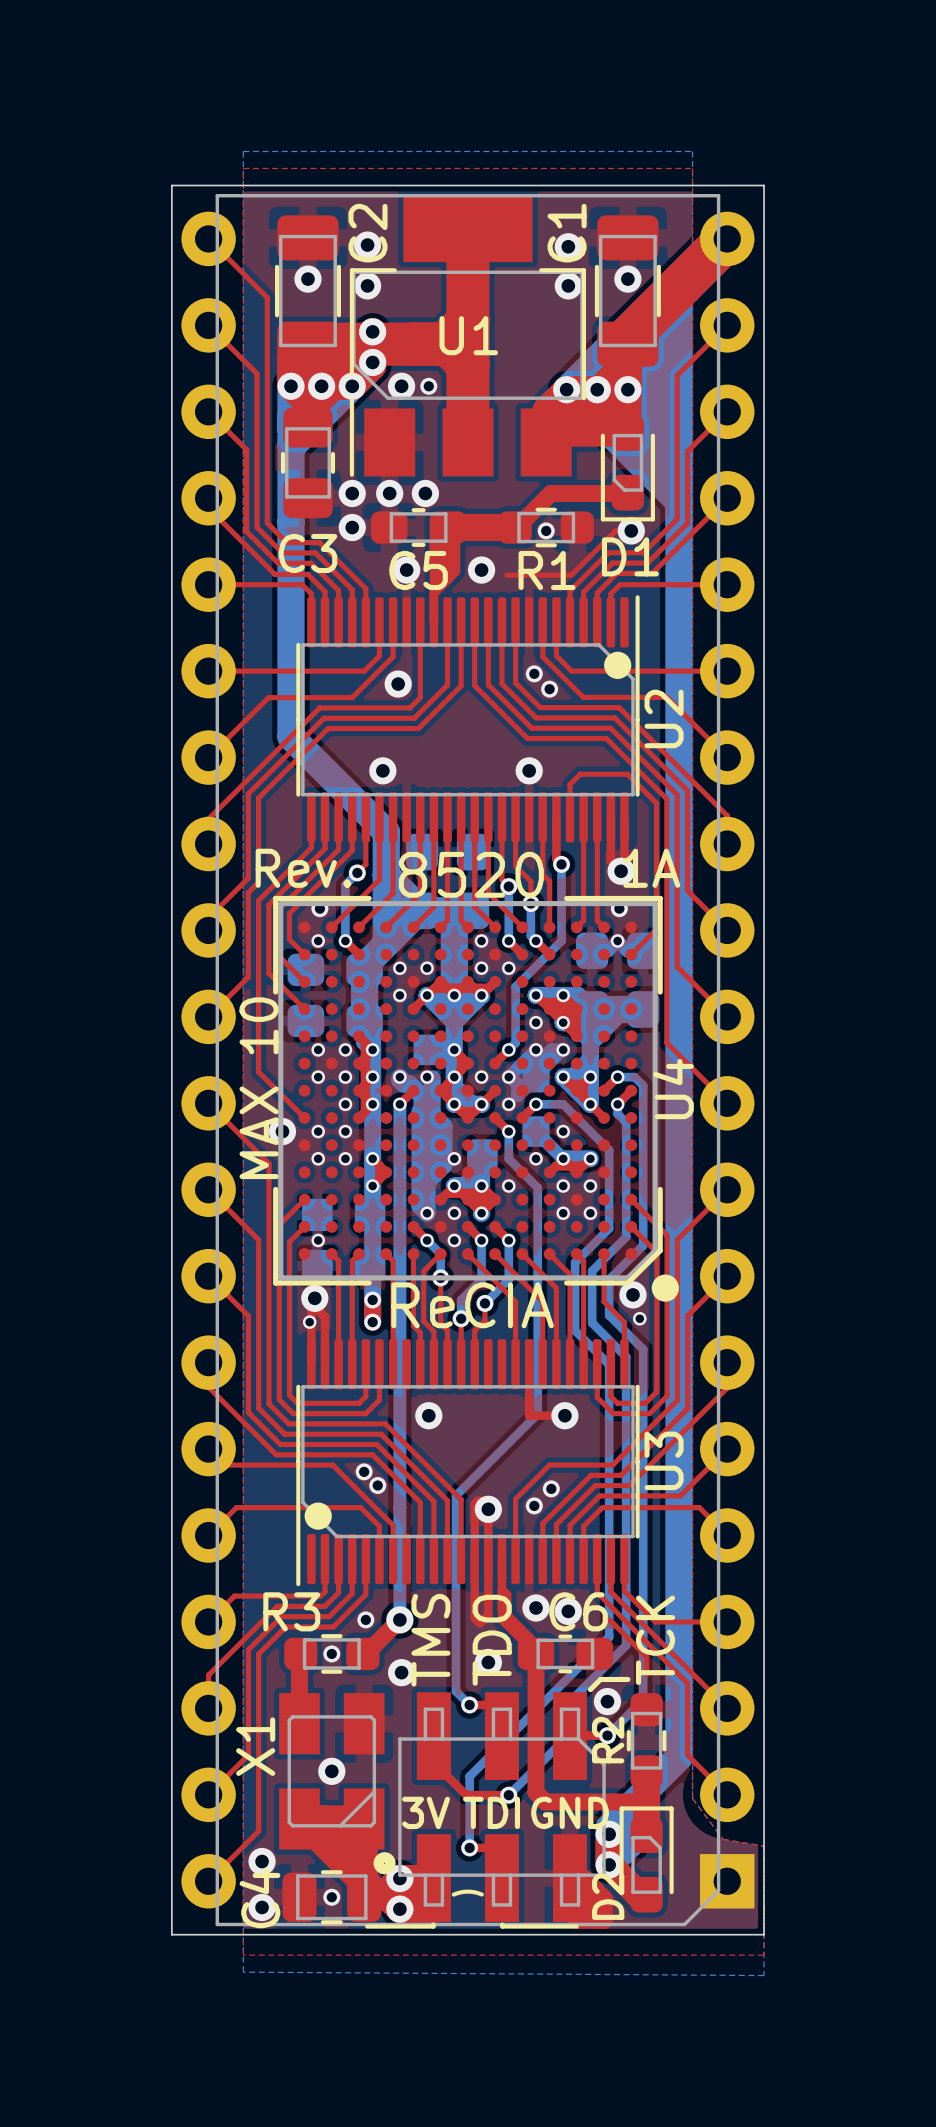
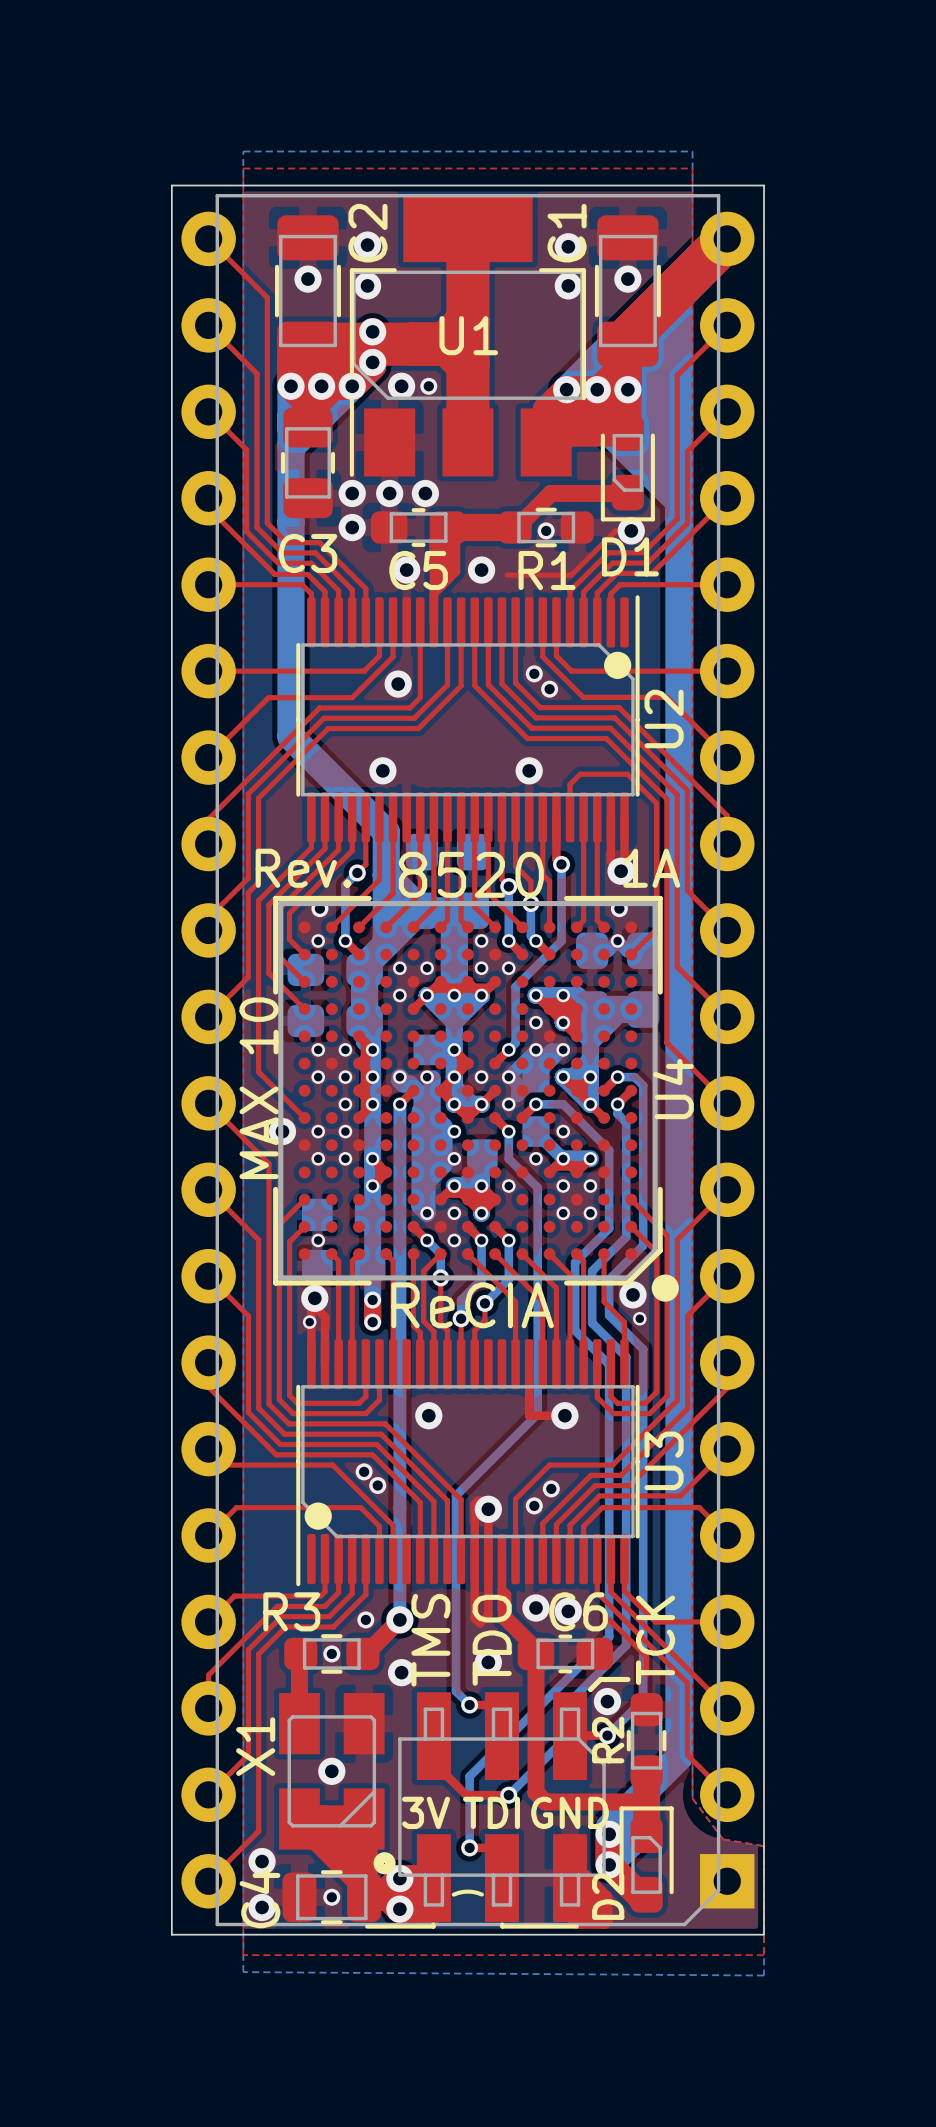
via: none -> (454, 1131)

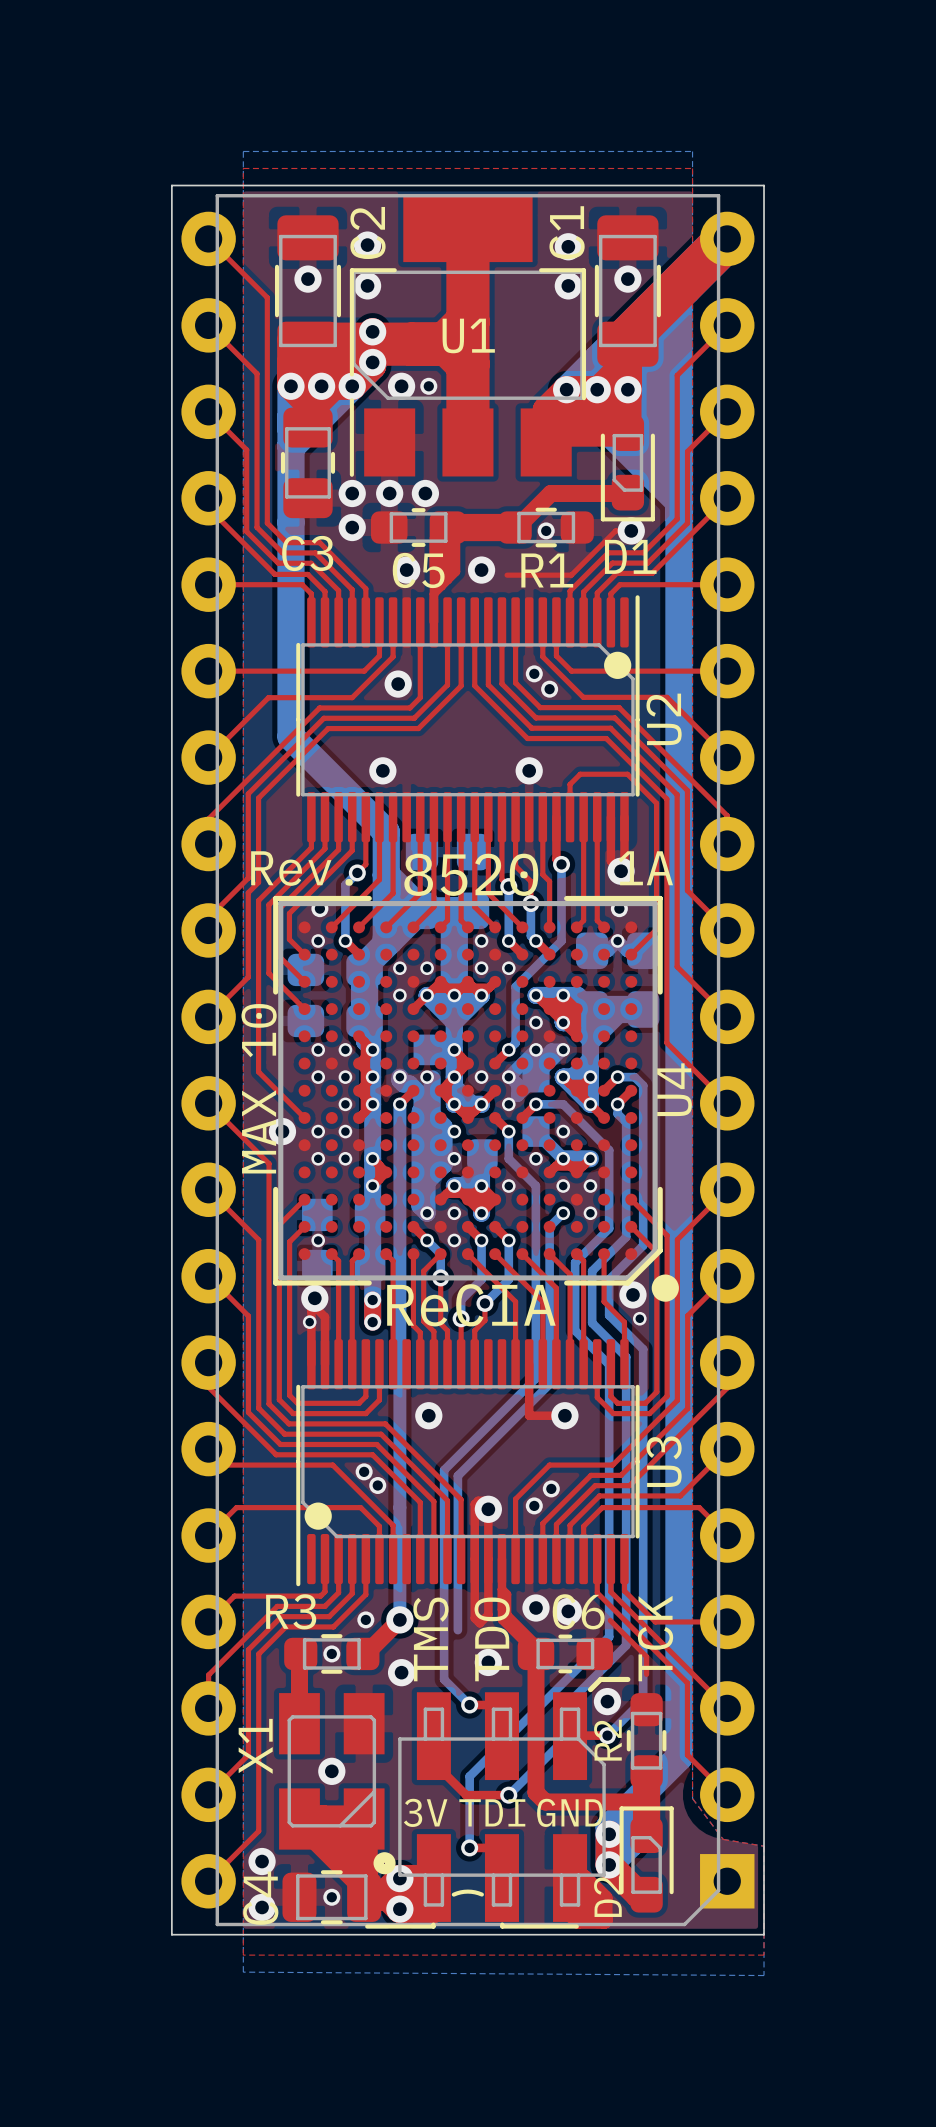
bottom track: (535, 1185) (537, 1187) (537, 1414) (456, 1495) (456, 1691) -> (535, 1185) (535, 1378) (444, 1470) (444, 1679) (456, 1691)
bottom track: none -> (563, 1213) (549, 1226) (549, 1384) (457, 1475) (457, 1630)

